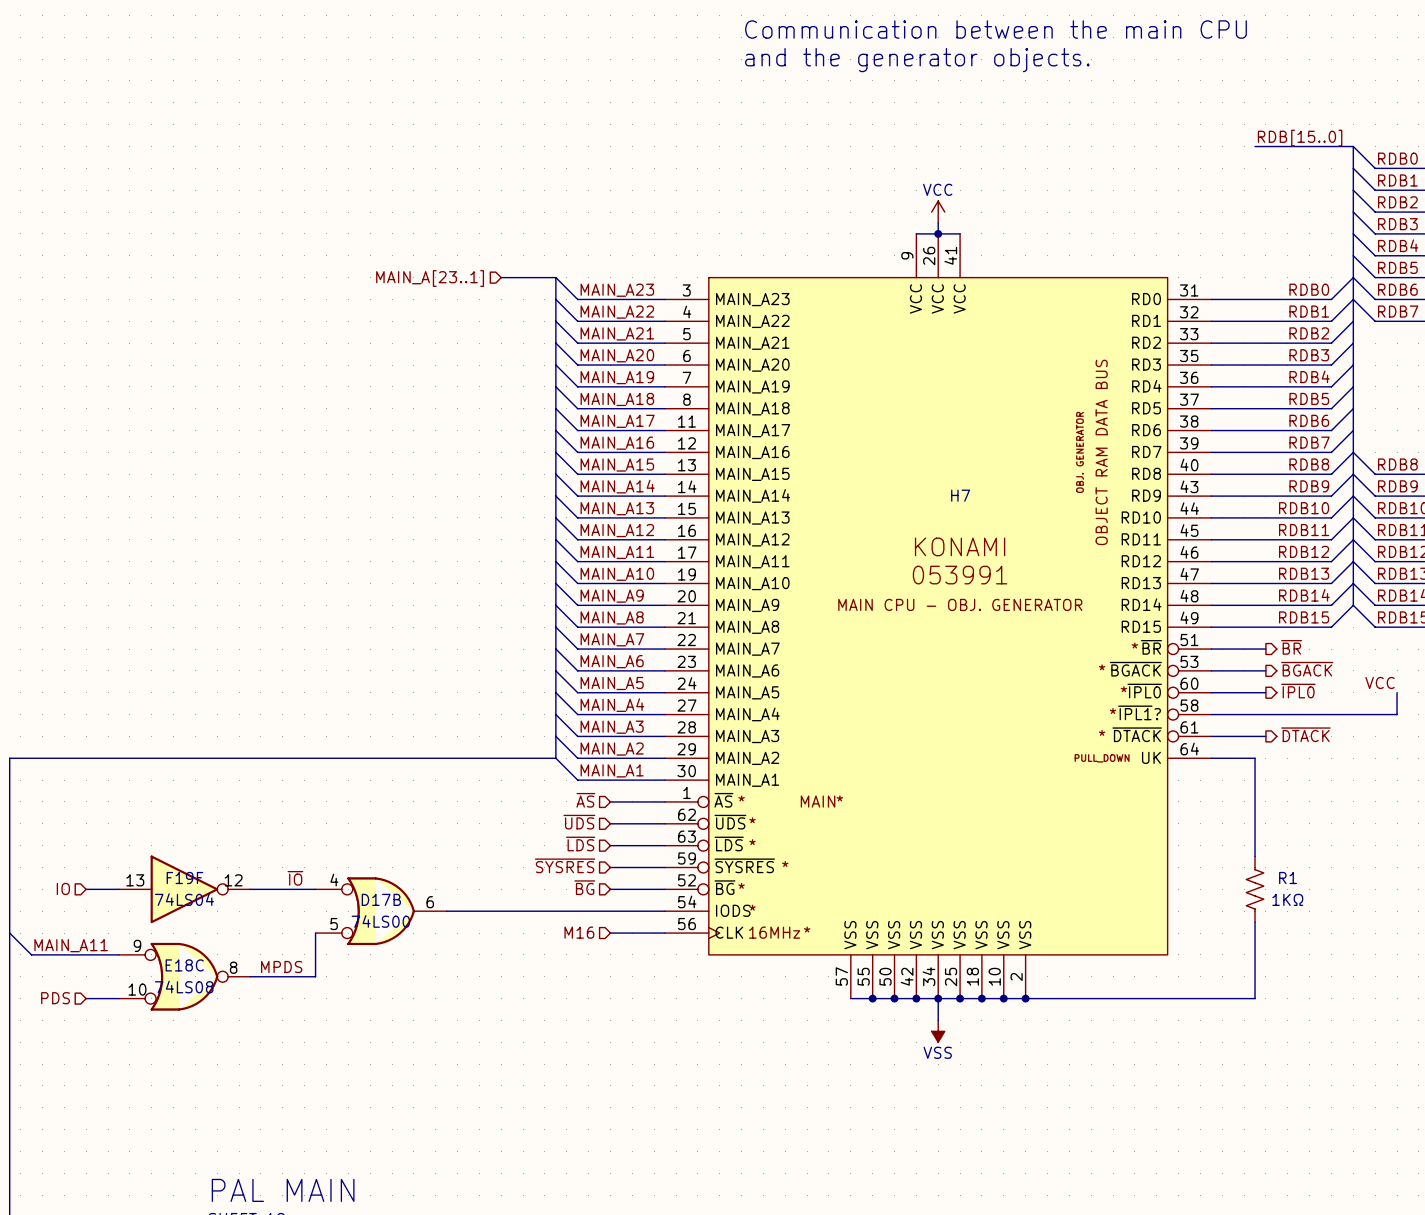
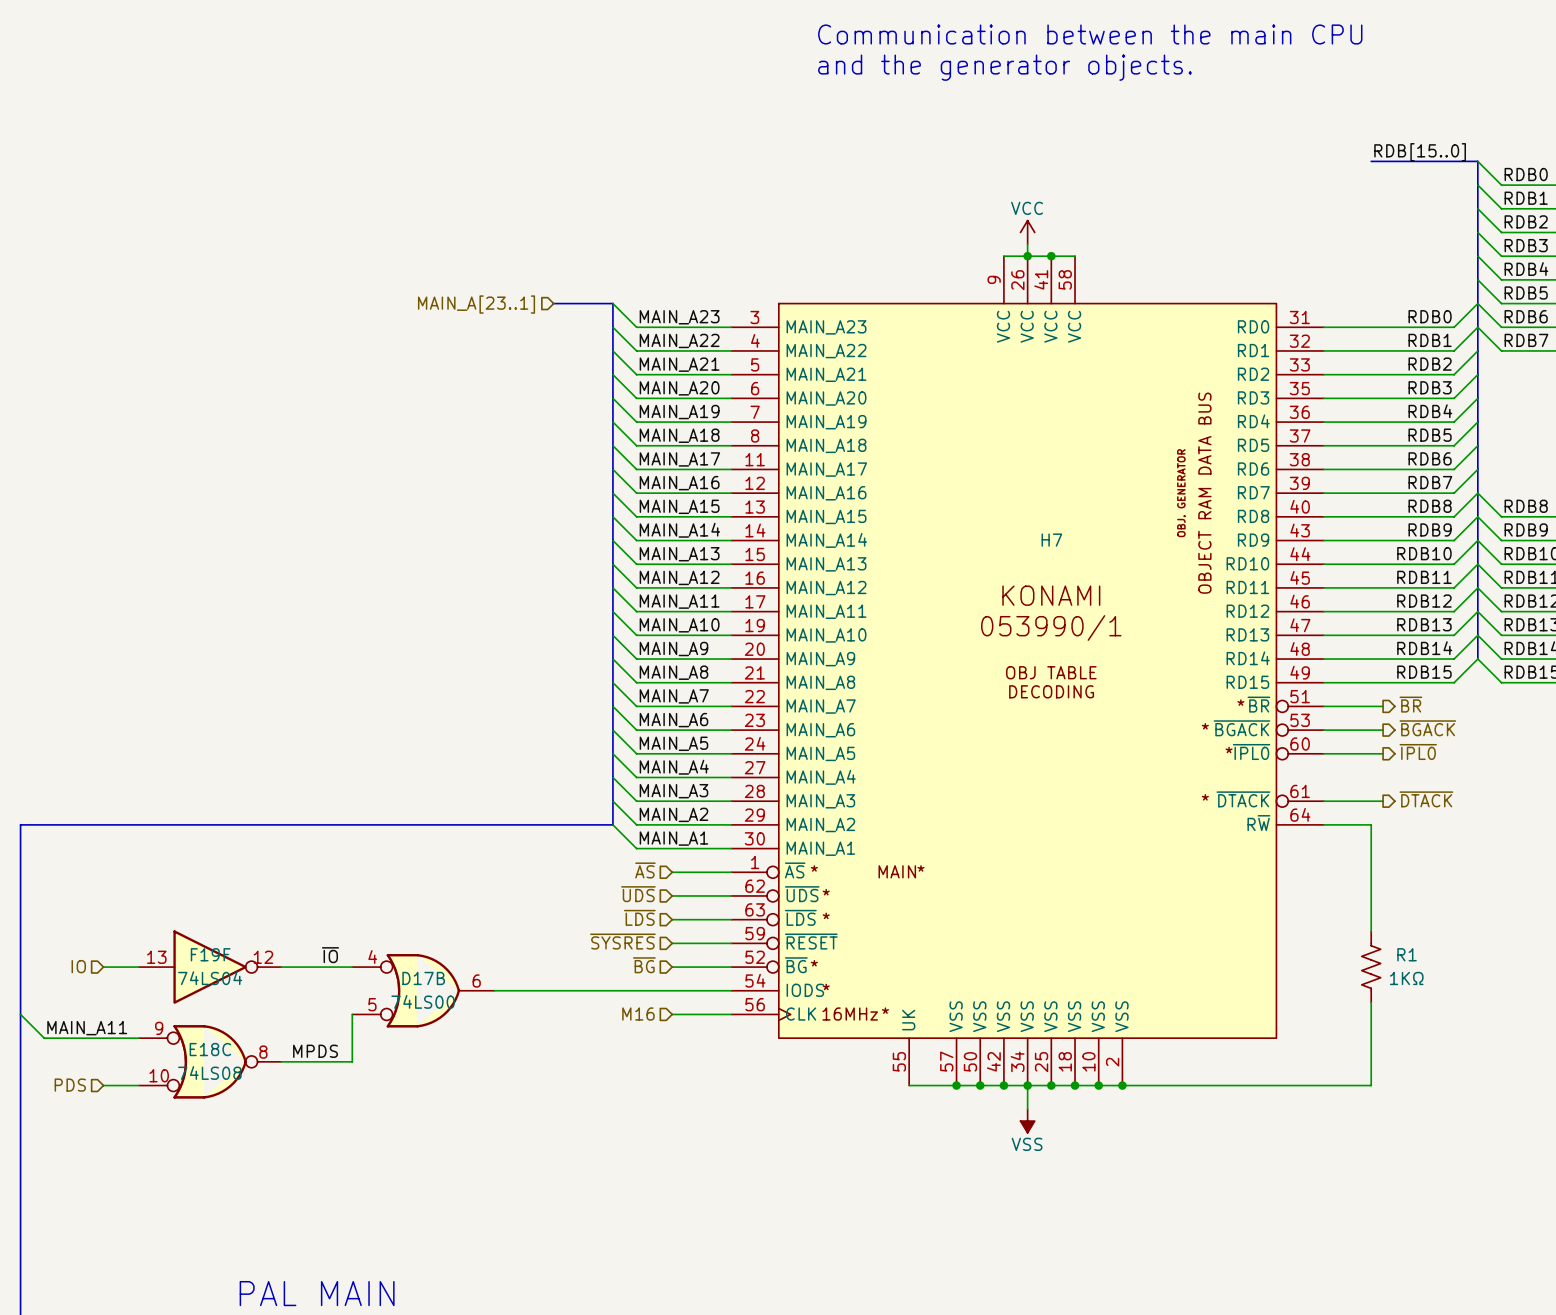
H7 symbol: [665, 233, 1212, 999] -> [731, 256, 1324, 1086]
wire: none -> (1051, 256) (1075, 256)
junction: none -> (1051, 256)
label: VCC (1380, 682) -> none
wire: (1397, 692) (1397, 714) (1211, 714) -> none
wire: none -> (909, 1085) (932, 1085)

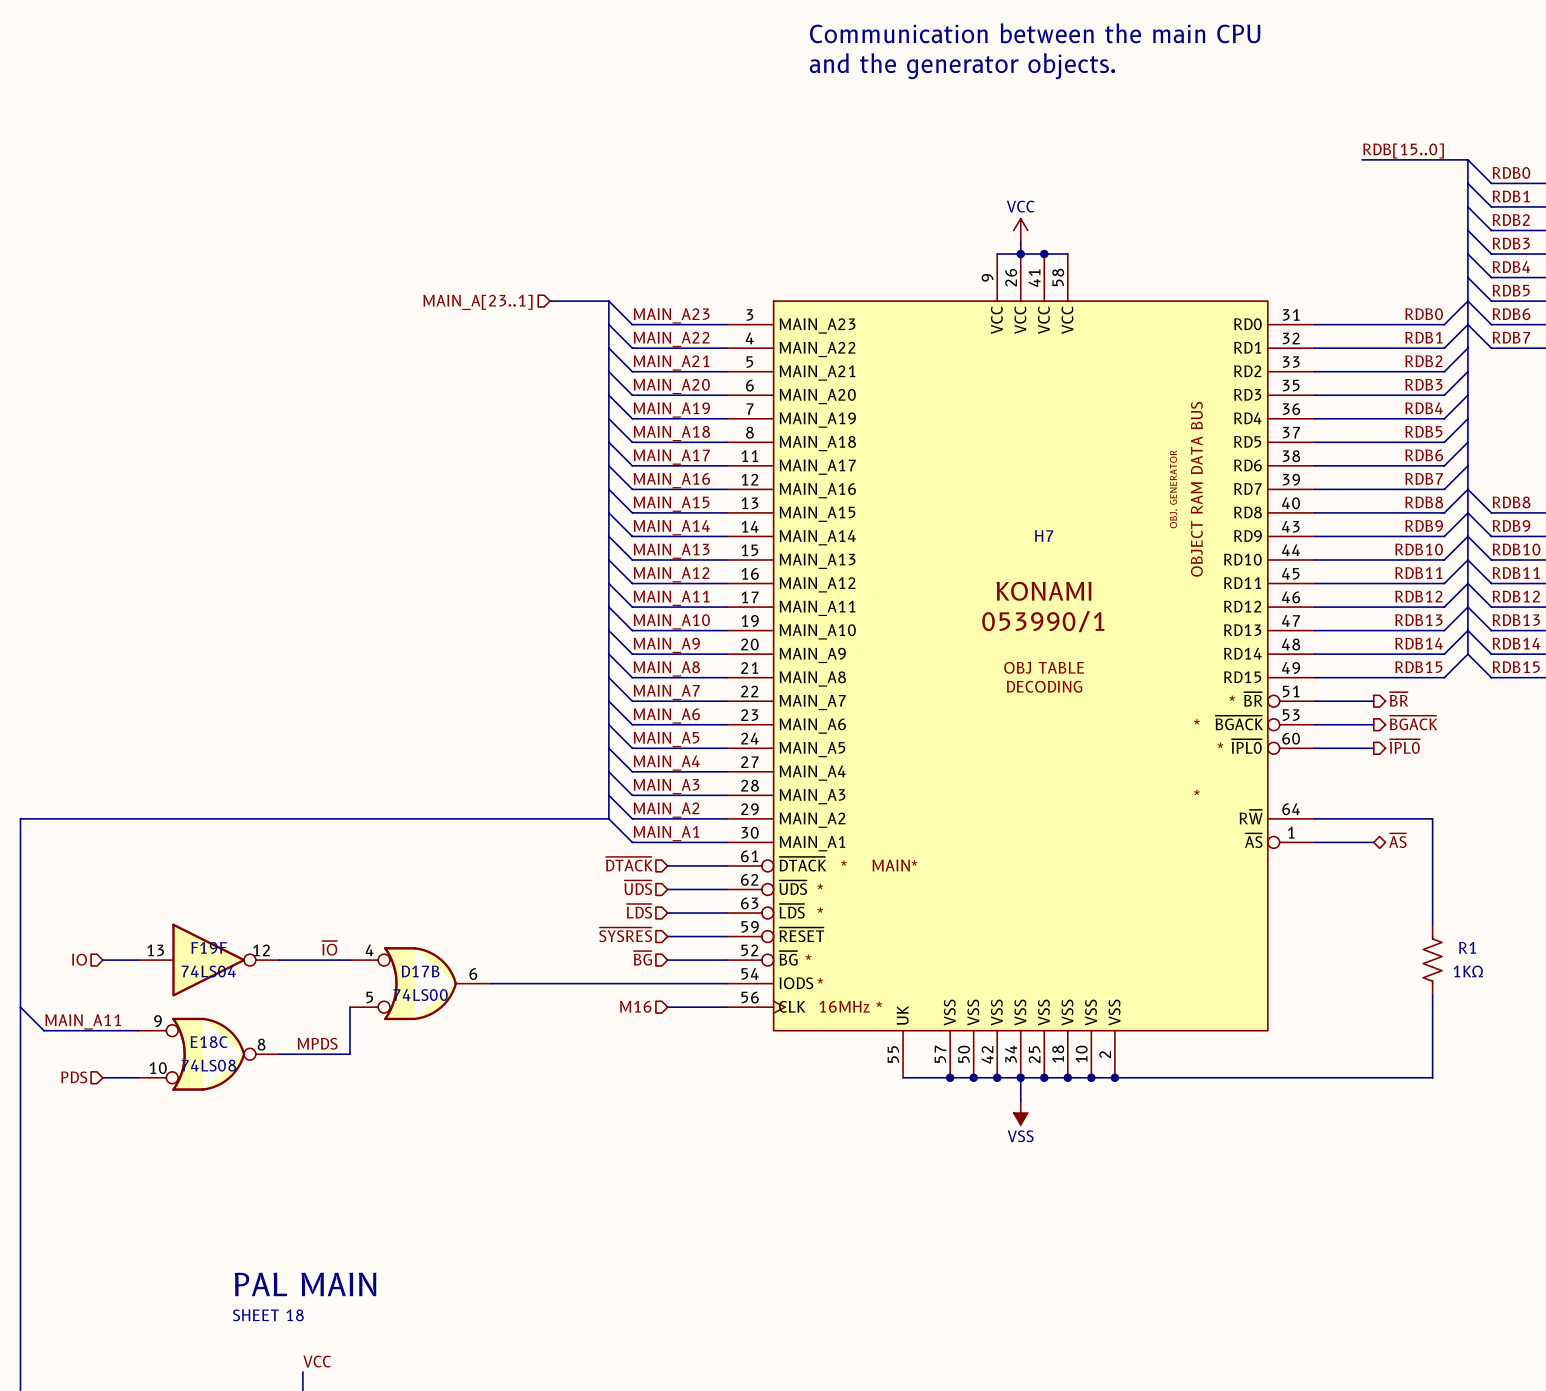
H7 symbol: [731, 256, 1324, 1086] -> [726, 254, 1315, 1078]
hierarchical label: ~{DTACK} (1426, 799) -> none
wire: (1323, 801) (1383, 801) -> (1314, 842) (1373, 842)
wire: (1371, 824) (1371, 931) -> (1362, 818) (1432, 818) (1432, 924)
hierarchical label: none -> ~{AS} (1397, 840)
hierarchical label: ~{AS} (645, 870) -> ~{DTACK} (629, 864)
R1 position: (1371, 967) -> (1432, 960)
wire: (1371, 1002) (1371, 1085) -> (1432, 995) (1432, 1077) (1362, 1077)

